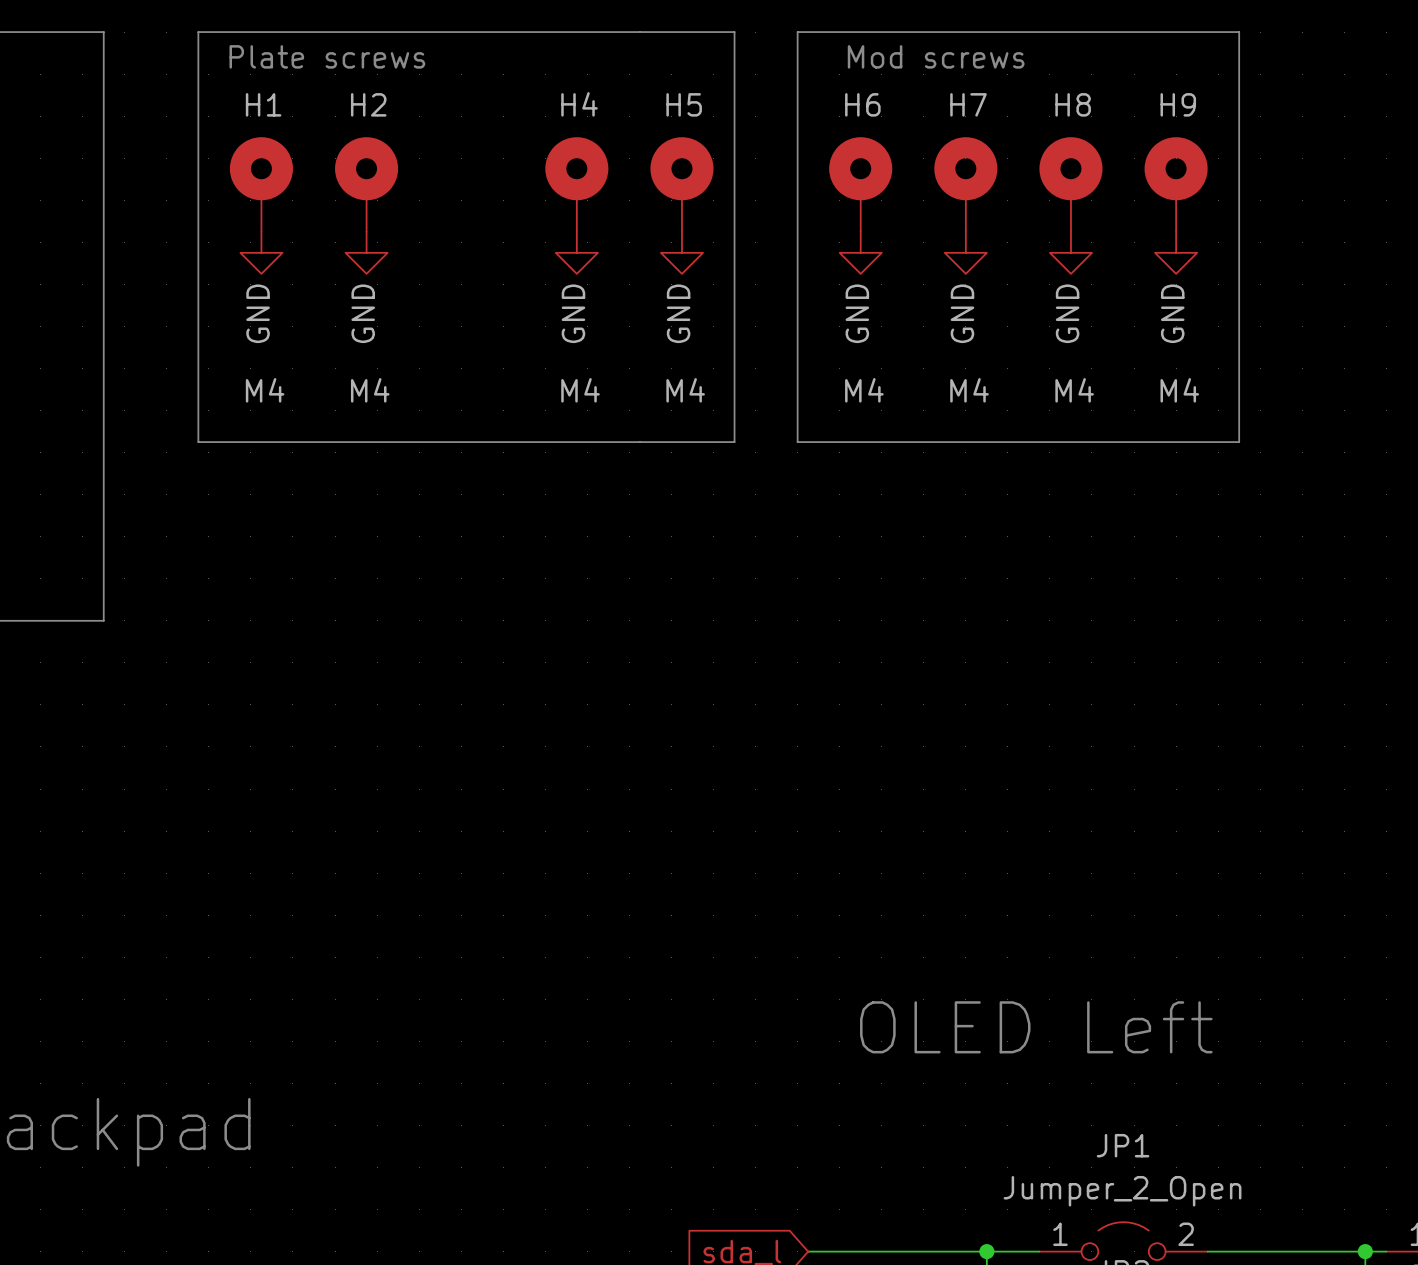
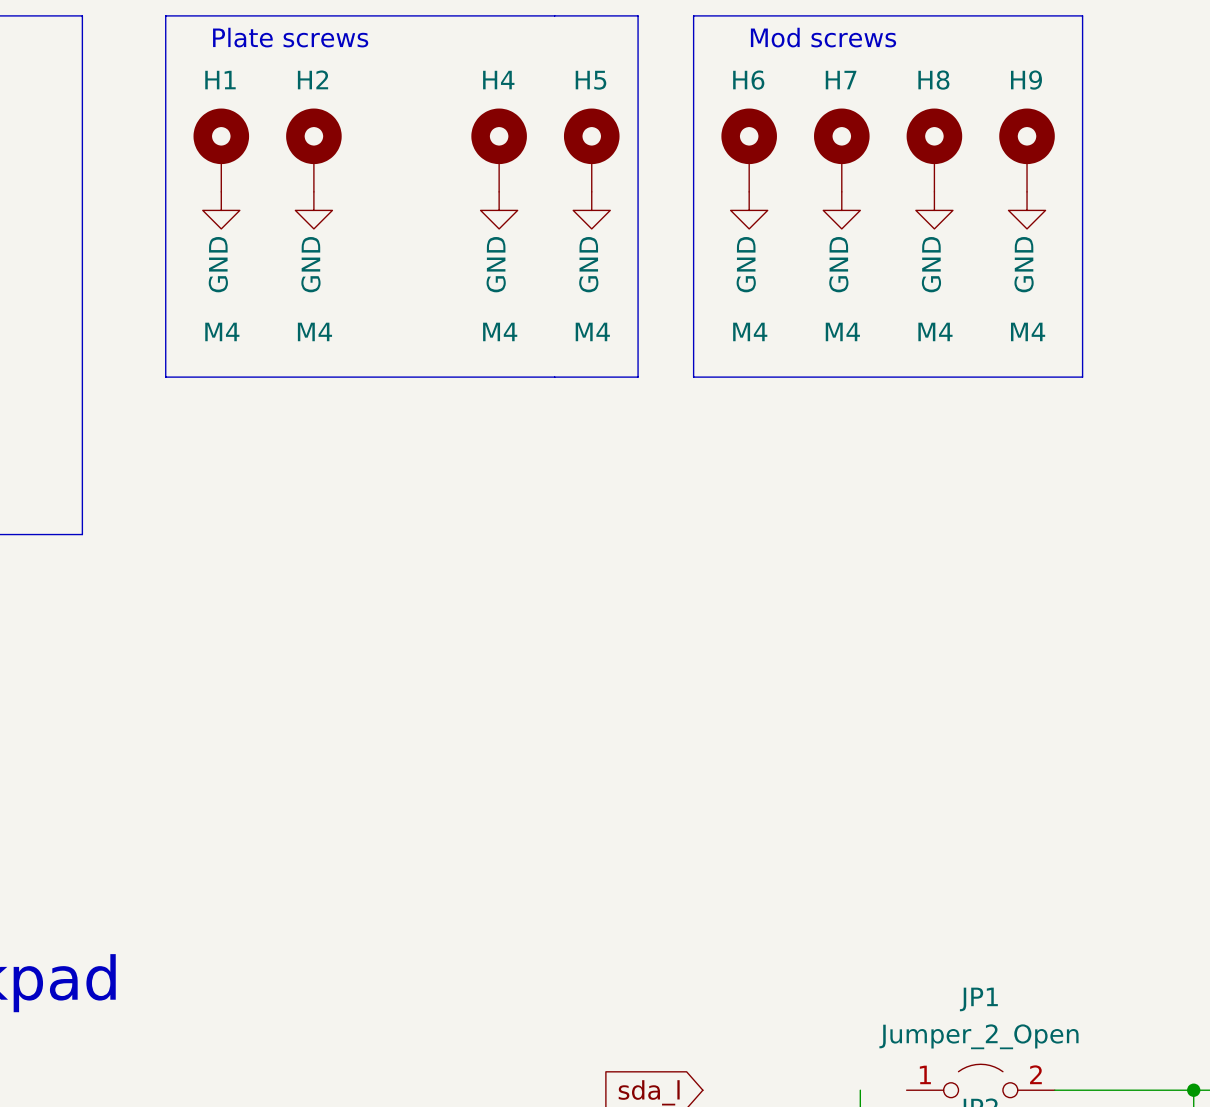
text: OLED Left (1036, 1027) -> none
wire: (808, 1251) (1039, 1251) -> none
junction: (986, 1251) -> none

